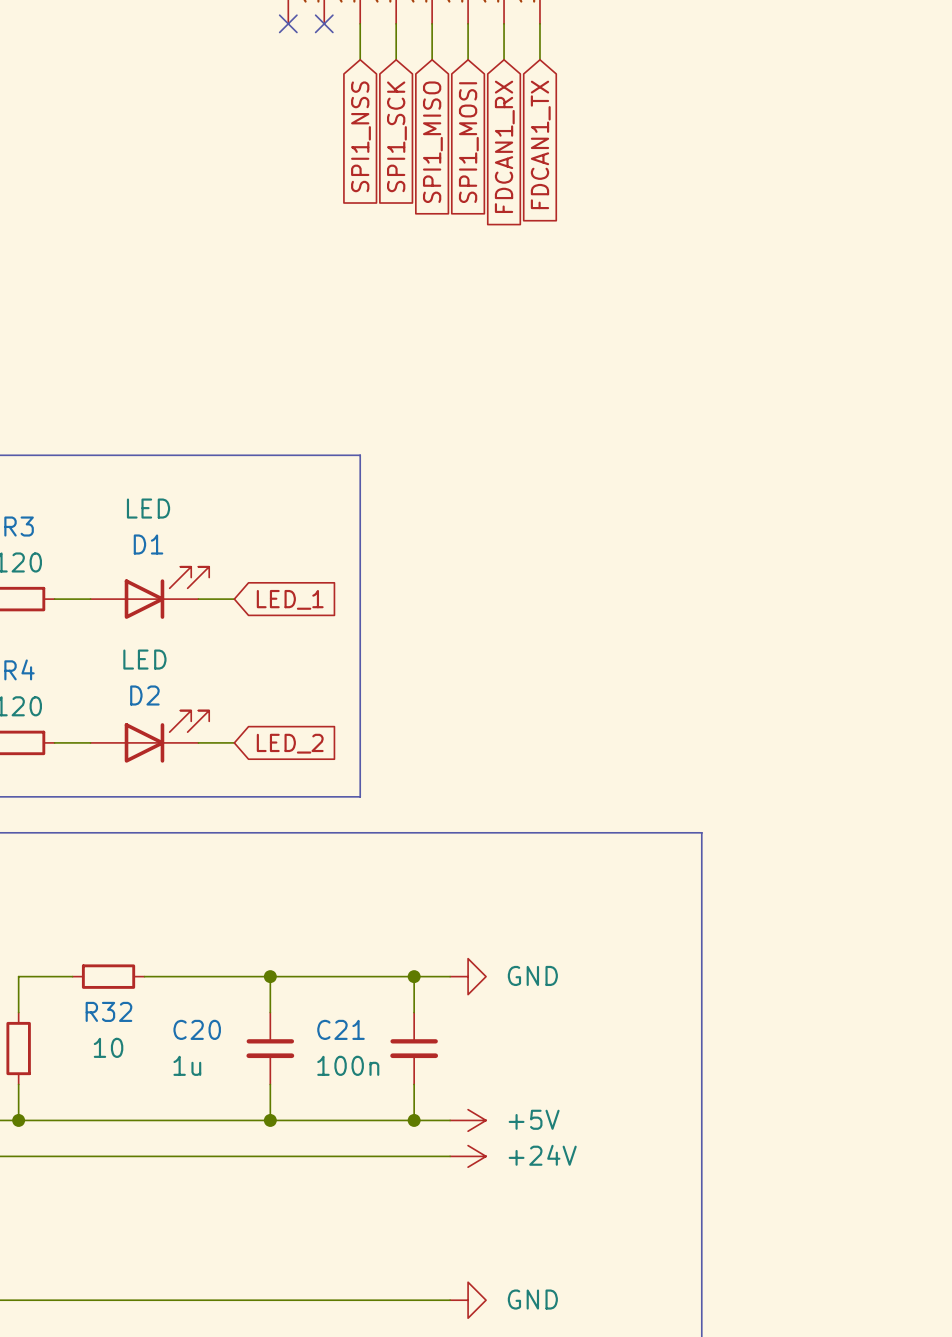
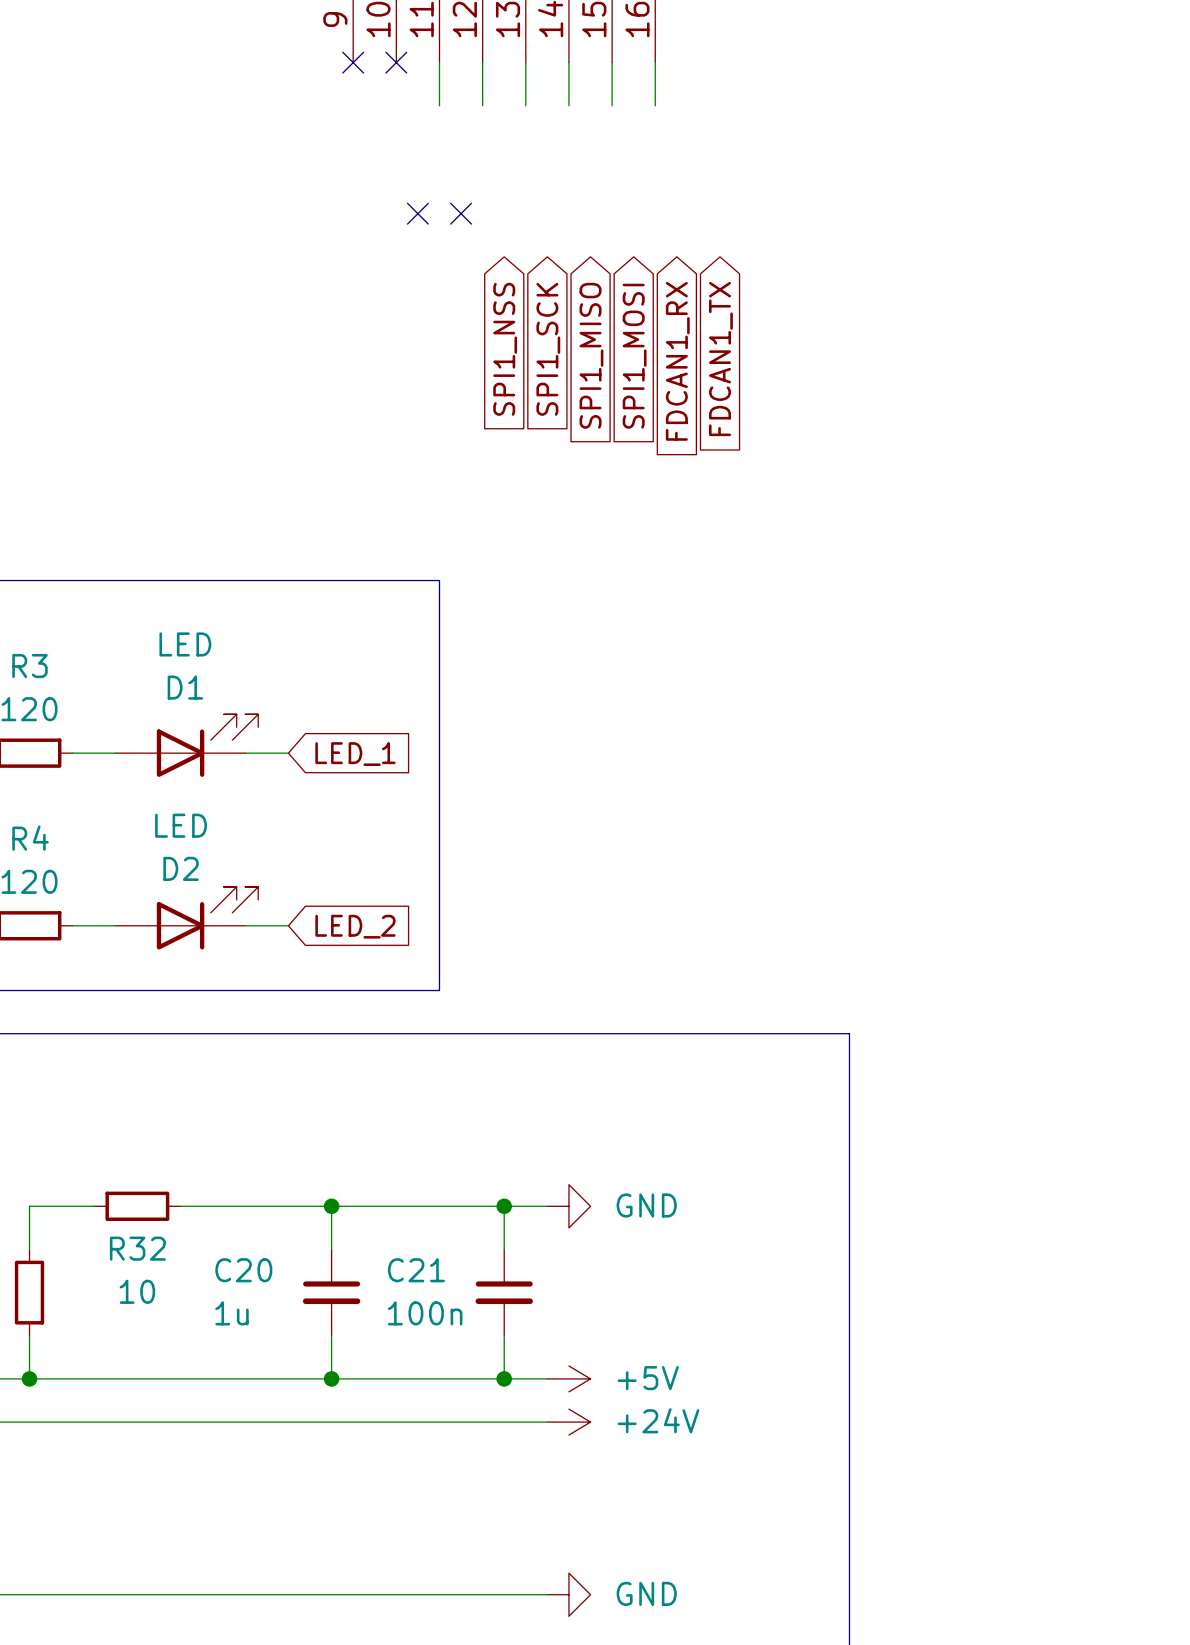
global label position: SPI1_NSS (360, 136) -> SPI1_NSS (505, 349)
global label position: SPI1_SCK (396, 136) -> SPI1_SCK (548, 349)
global label position: SPI1_MISO (432, 142) -> SPI1_MISO (591, 355)
global label position: SPI1_MOSI (468, 142) -> SPI1_MOSI (634, 356)
global label position: FDCAN1_TX (540, 144) -> FDCAN1_TX (720, 359)
global label position: FDCAN1_RX (504, 146) -> FDCAN1_RX (677, 361)
no-connect mark: none -> (417, 213)
no-connect mark: none -> (461, 213)

